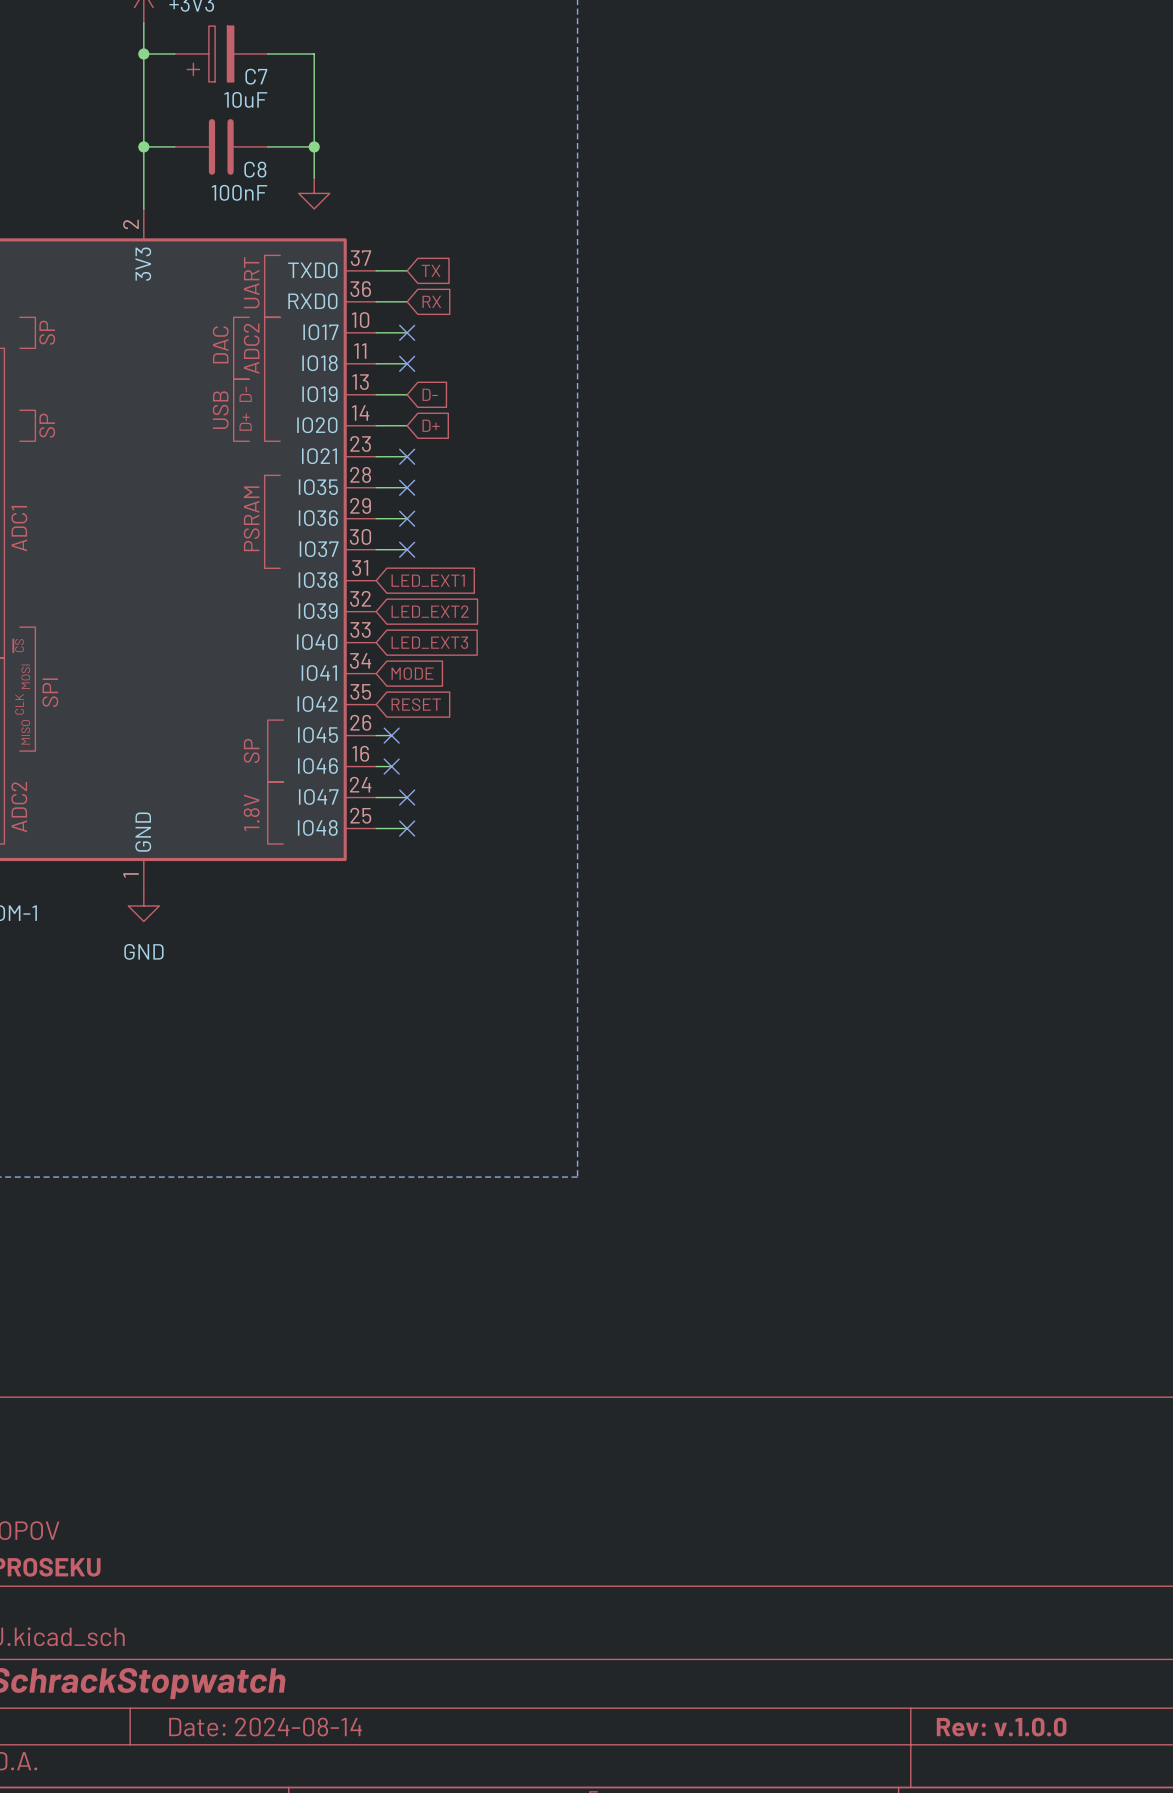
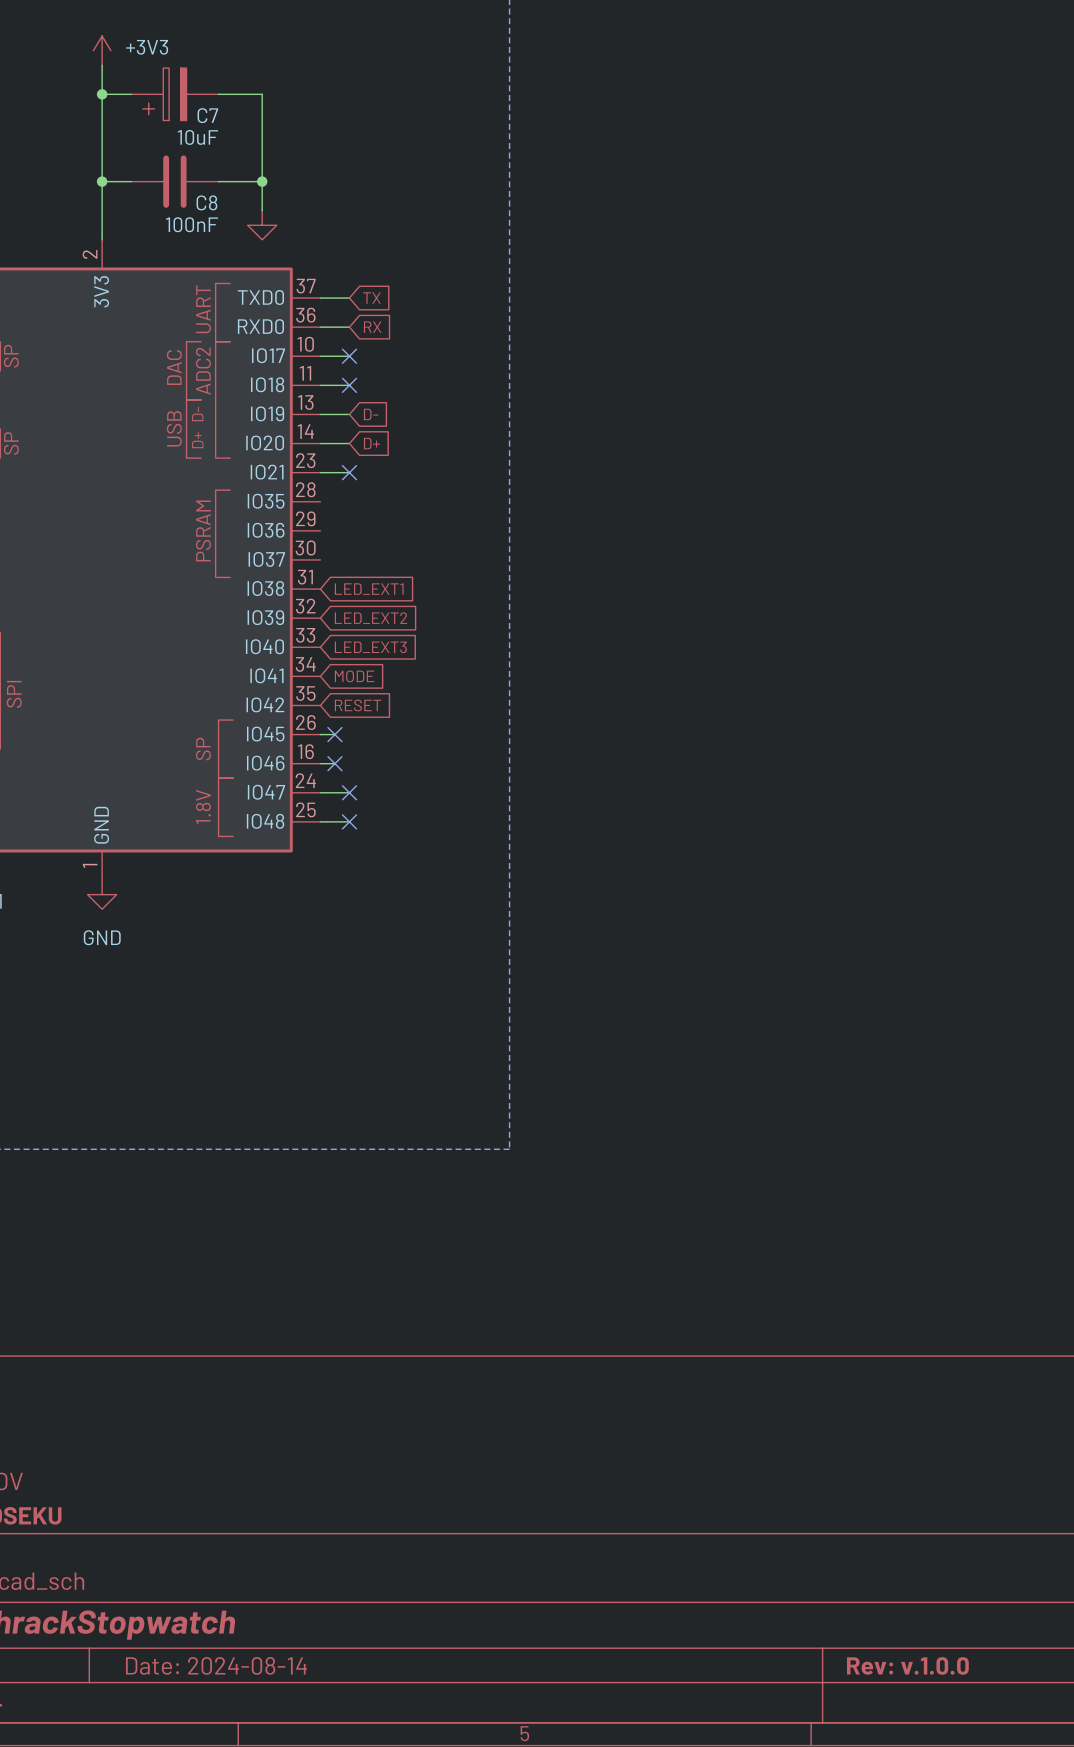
wire: (376, 487) (407, 487) -> none
no-connect mark: (407, 487) -> none
wire: (376, 518) (407, 518) -> none
no-connect mark: (407, 518) -> none
wire: (376, 549) (407, 549) -> none
no-connect mark: (407, 549) -> none

